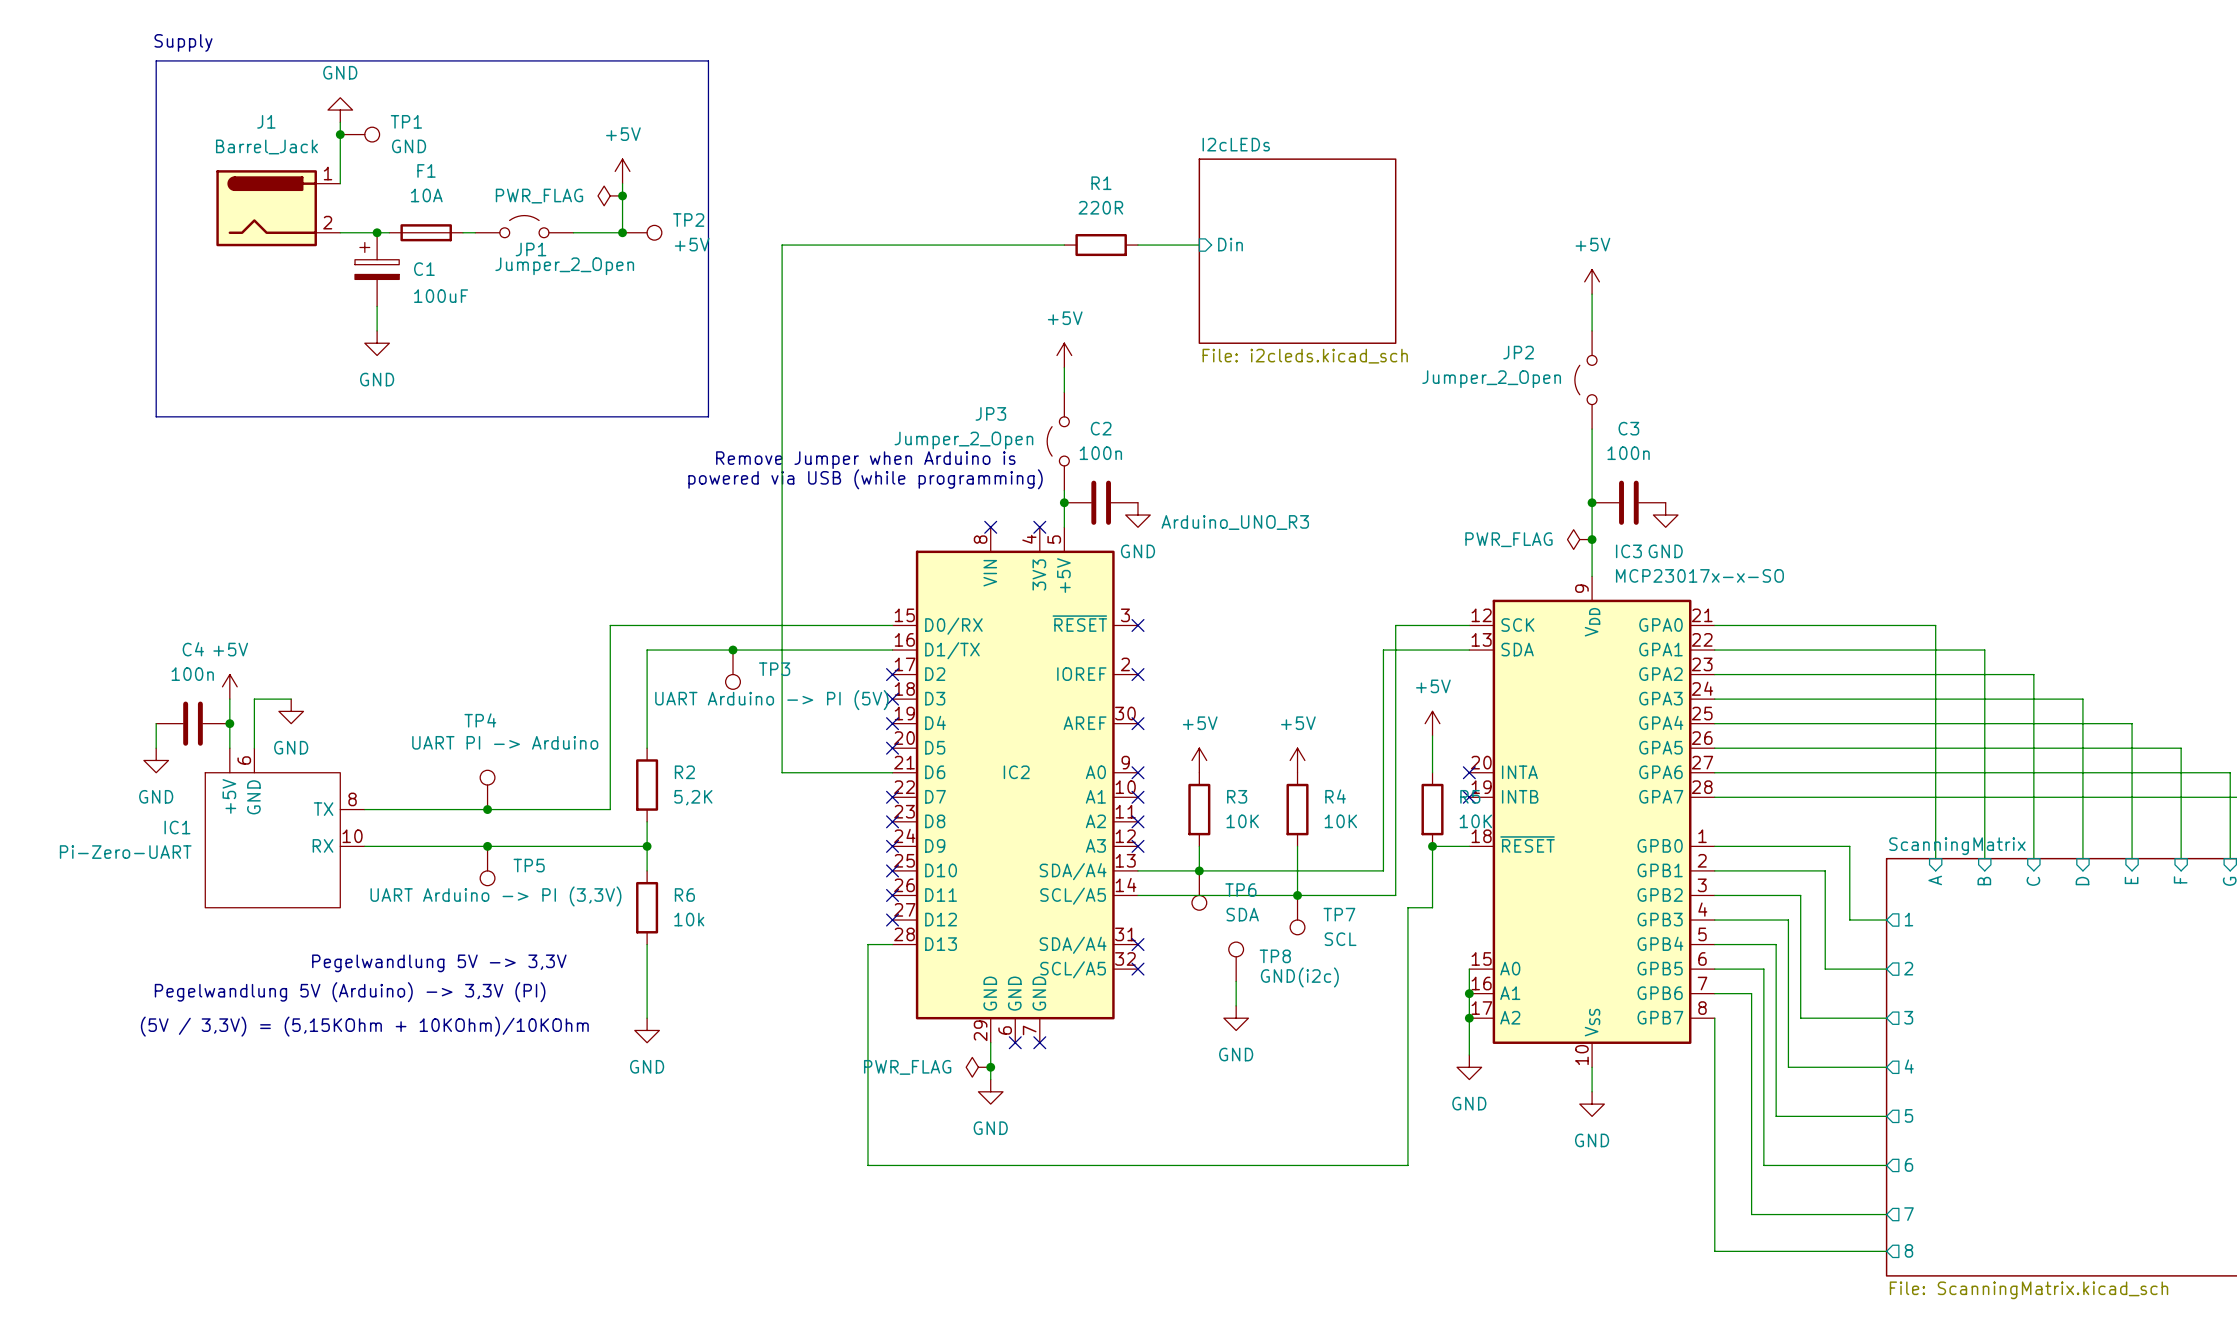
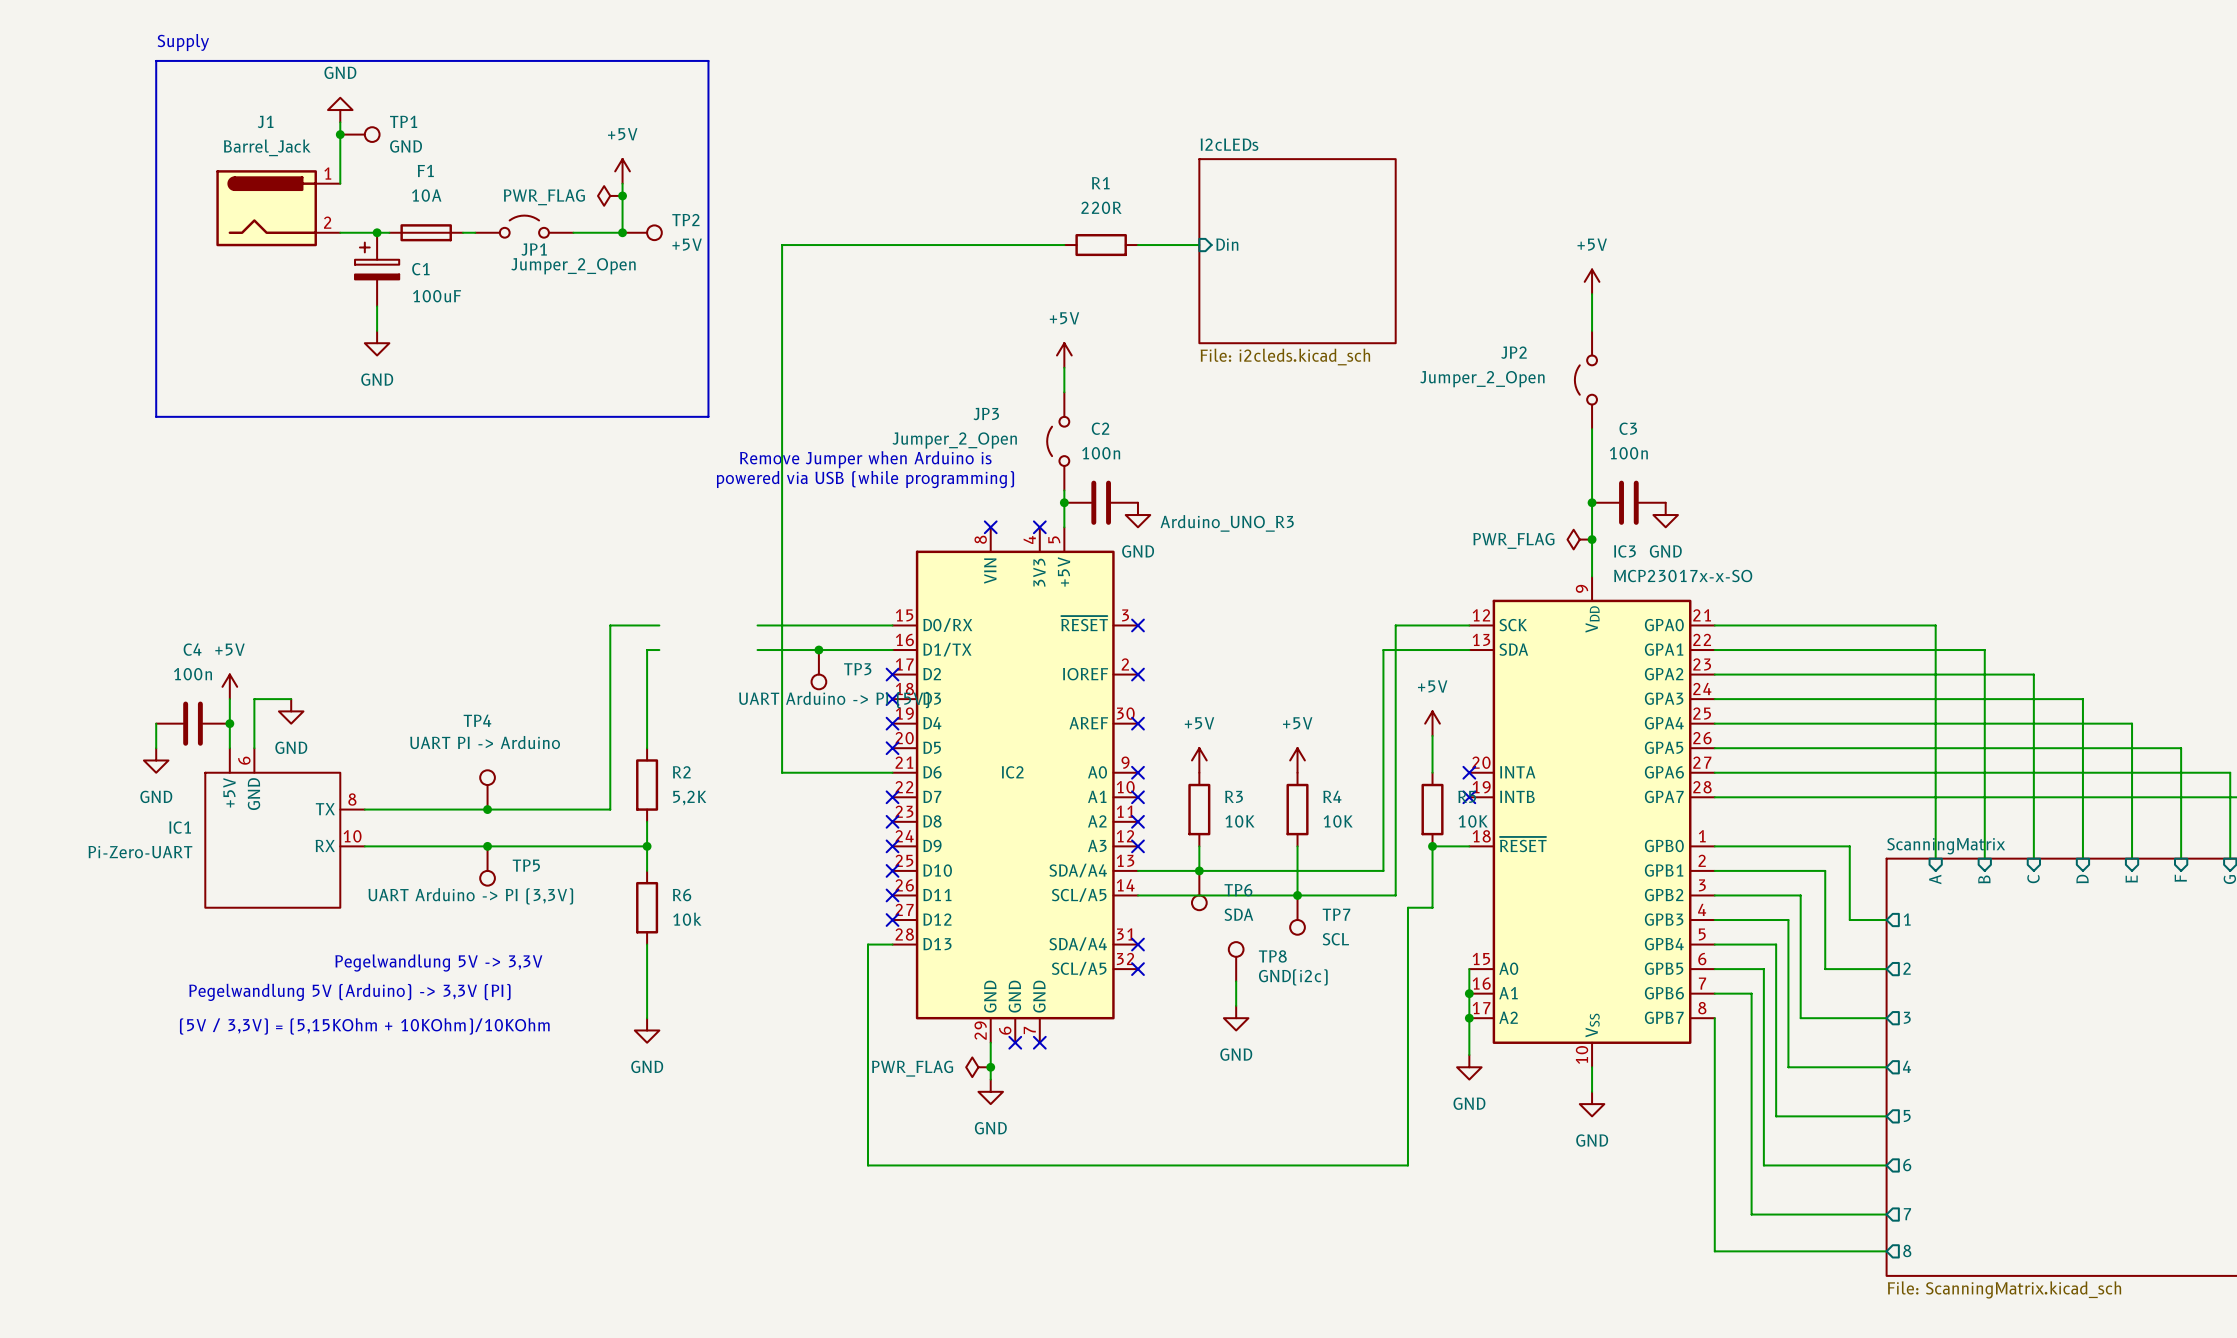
wire: (659, 625) (757, 625) -> none
wire: (659, 650) (757, 650) -> none
junction: (733, 650) -> none
junction: none -> (818, 650)
TP3 position: (733, 669) -> (818, 669)

